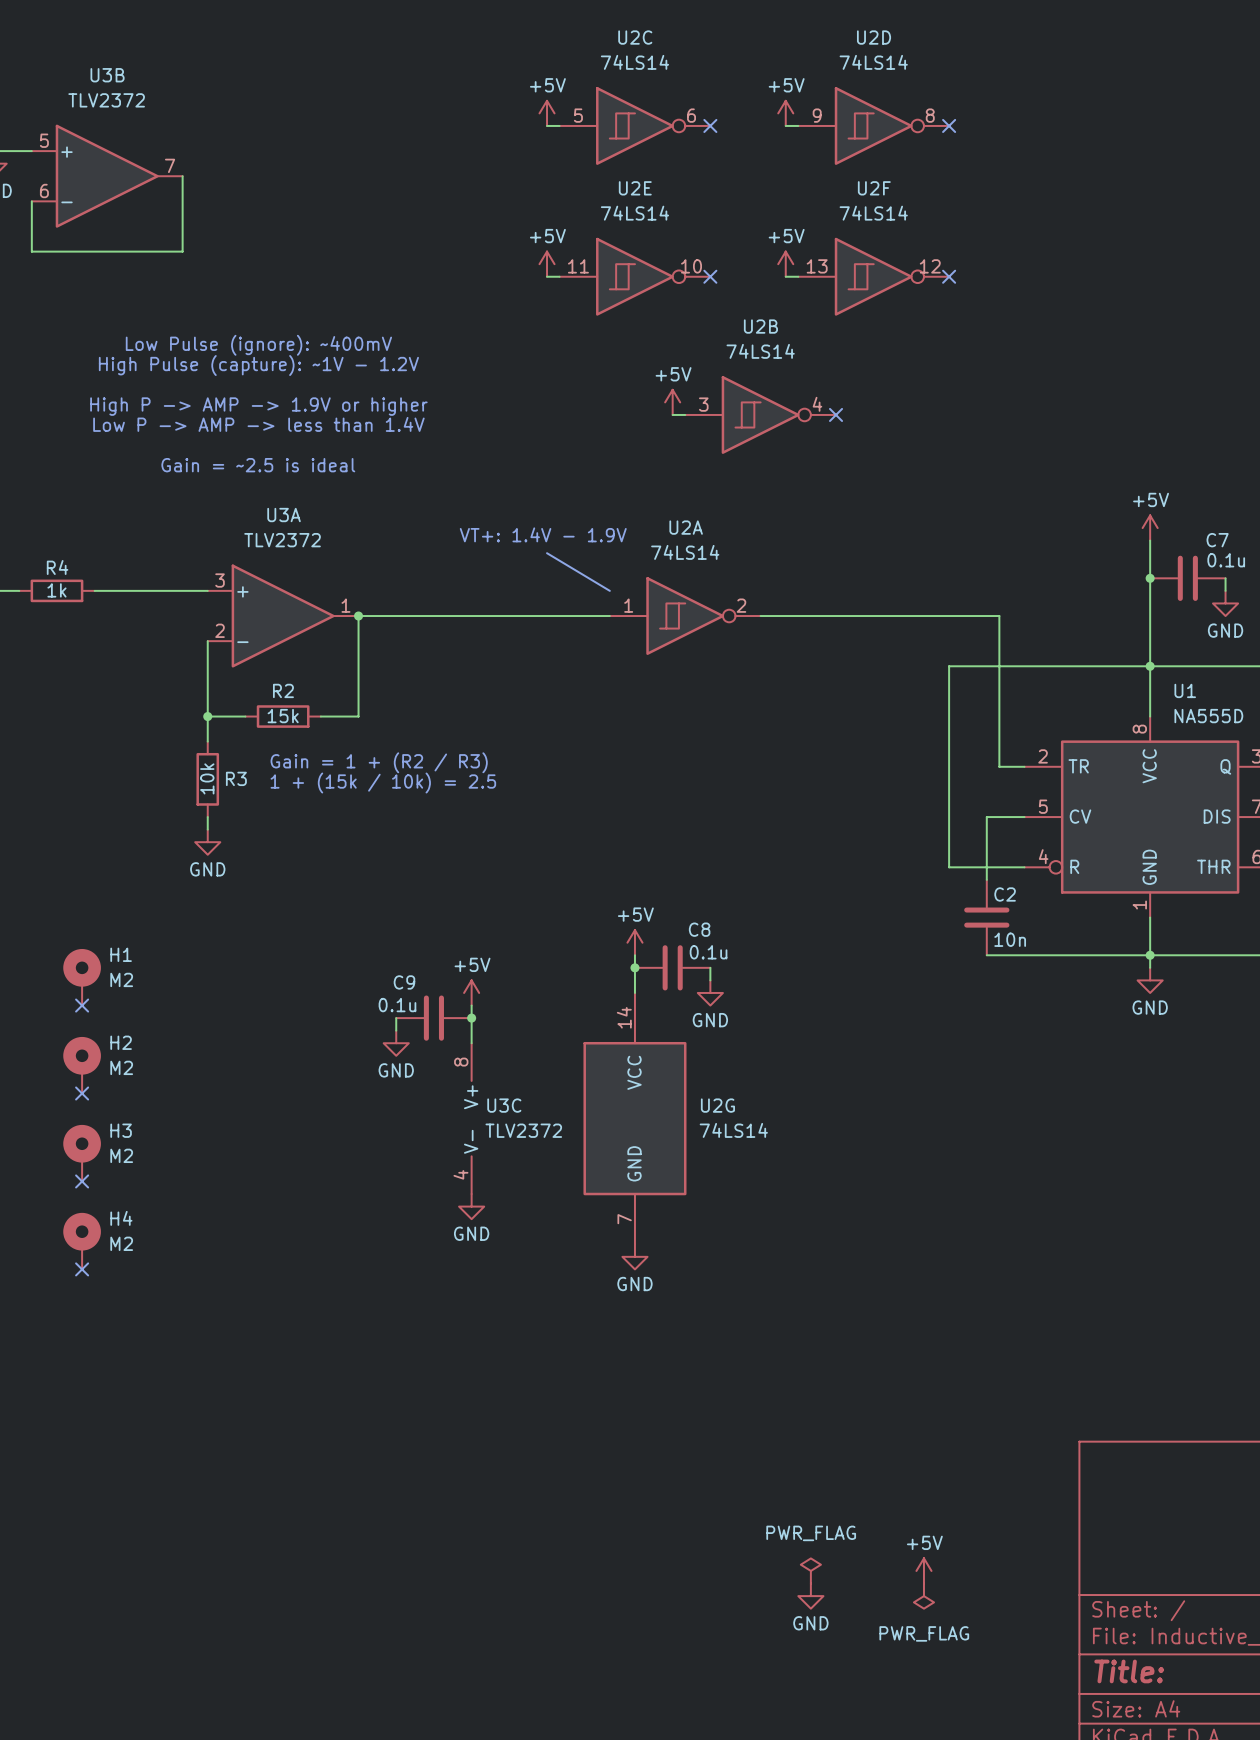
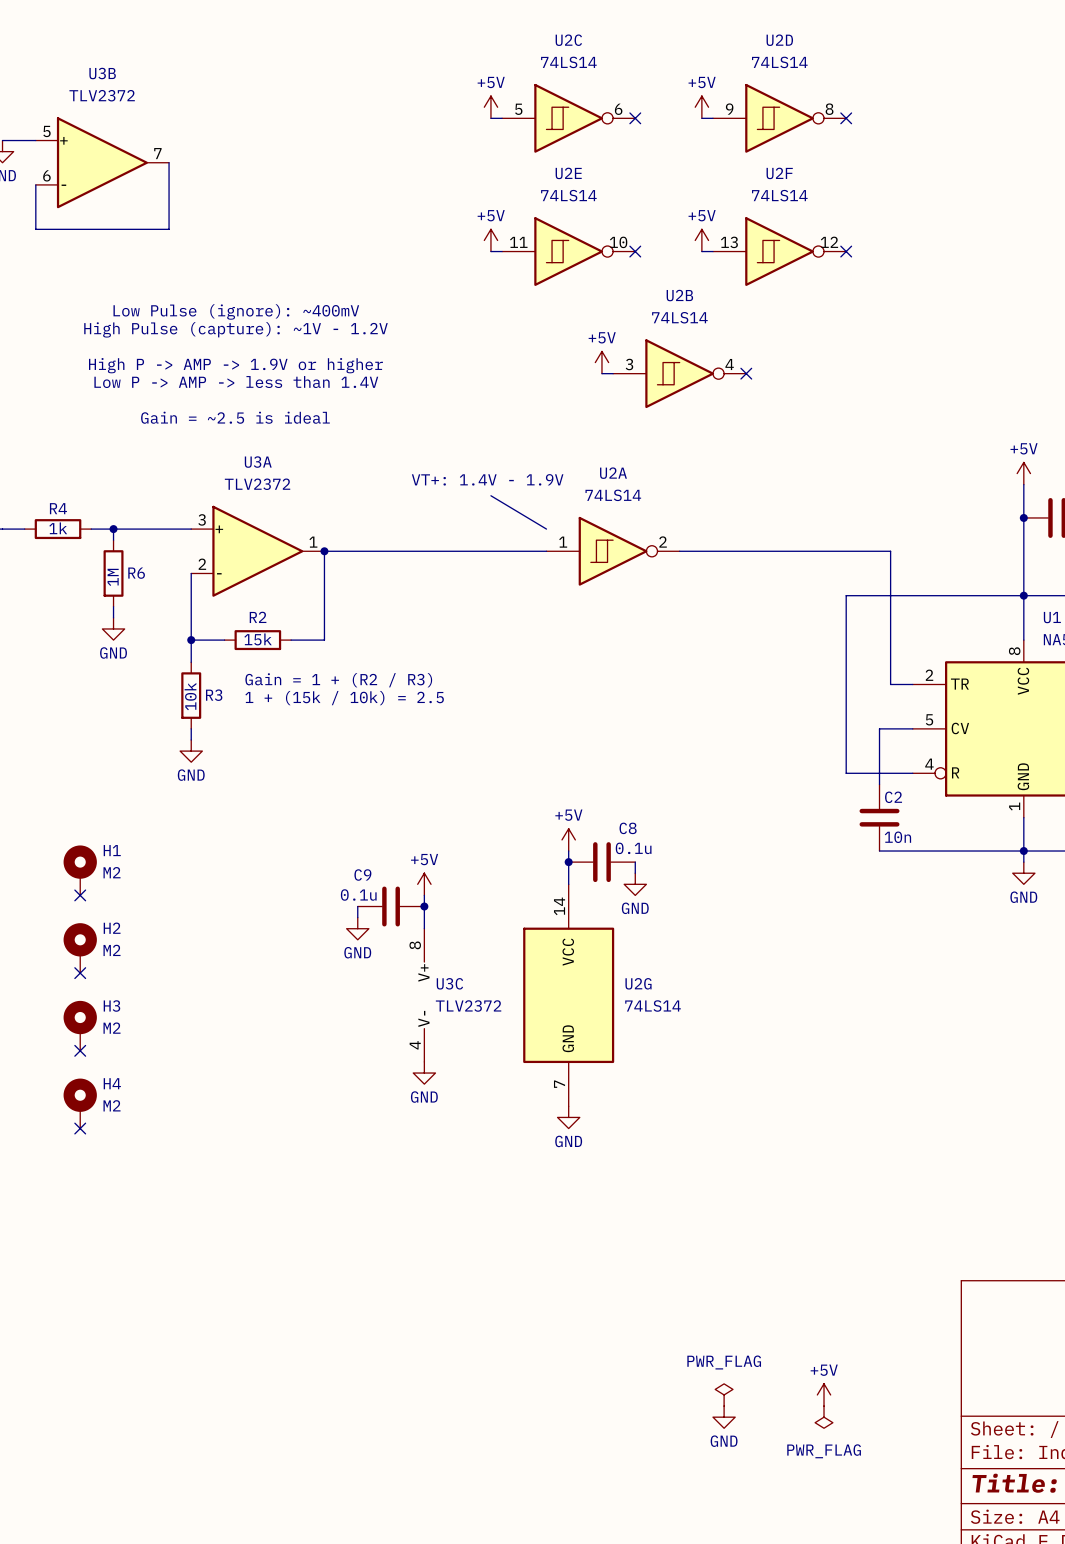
wire: none -> (113, 529) (113, 540)
junction: none -> (113, 529)
R6: none -> 1M (113, 573)
wire: none -> (113, 606) (113, 617)
power symbol: none -> GND (113, 628)

